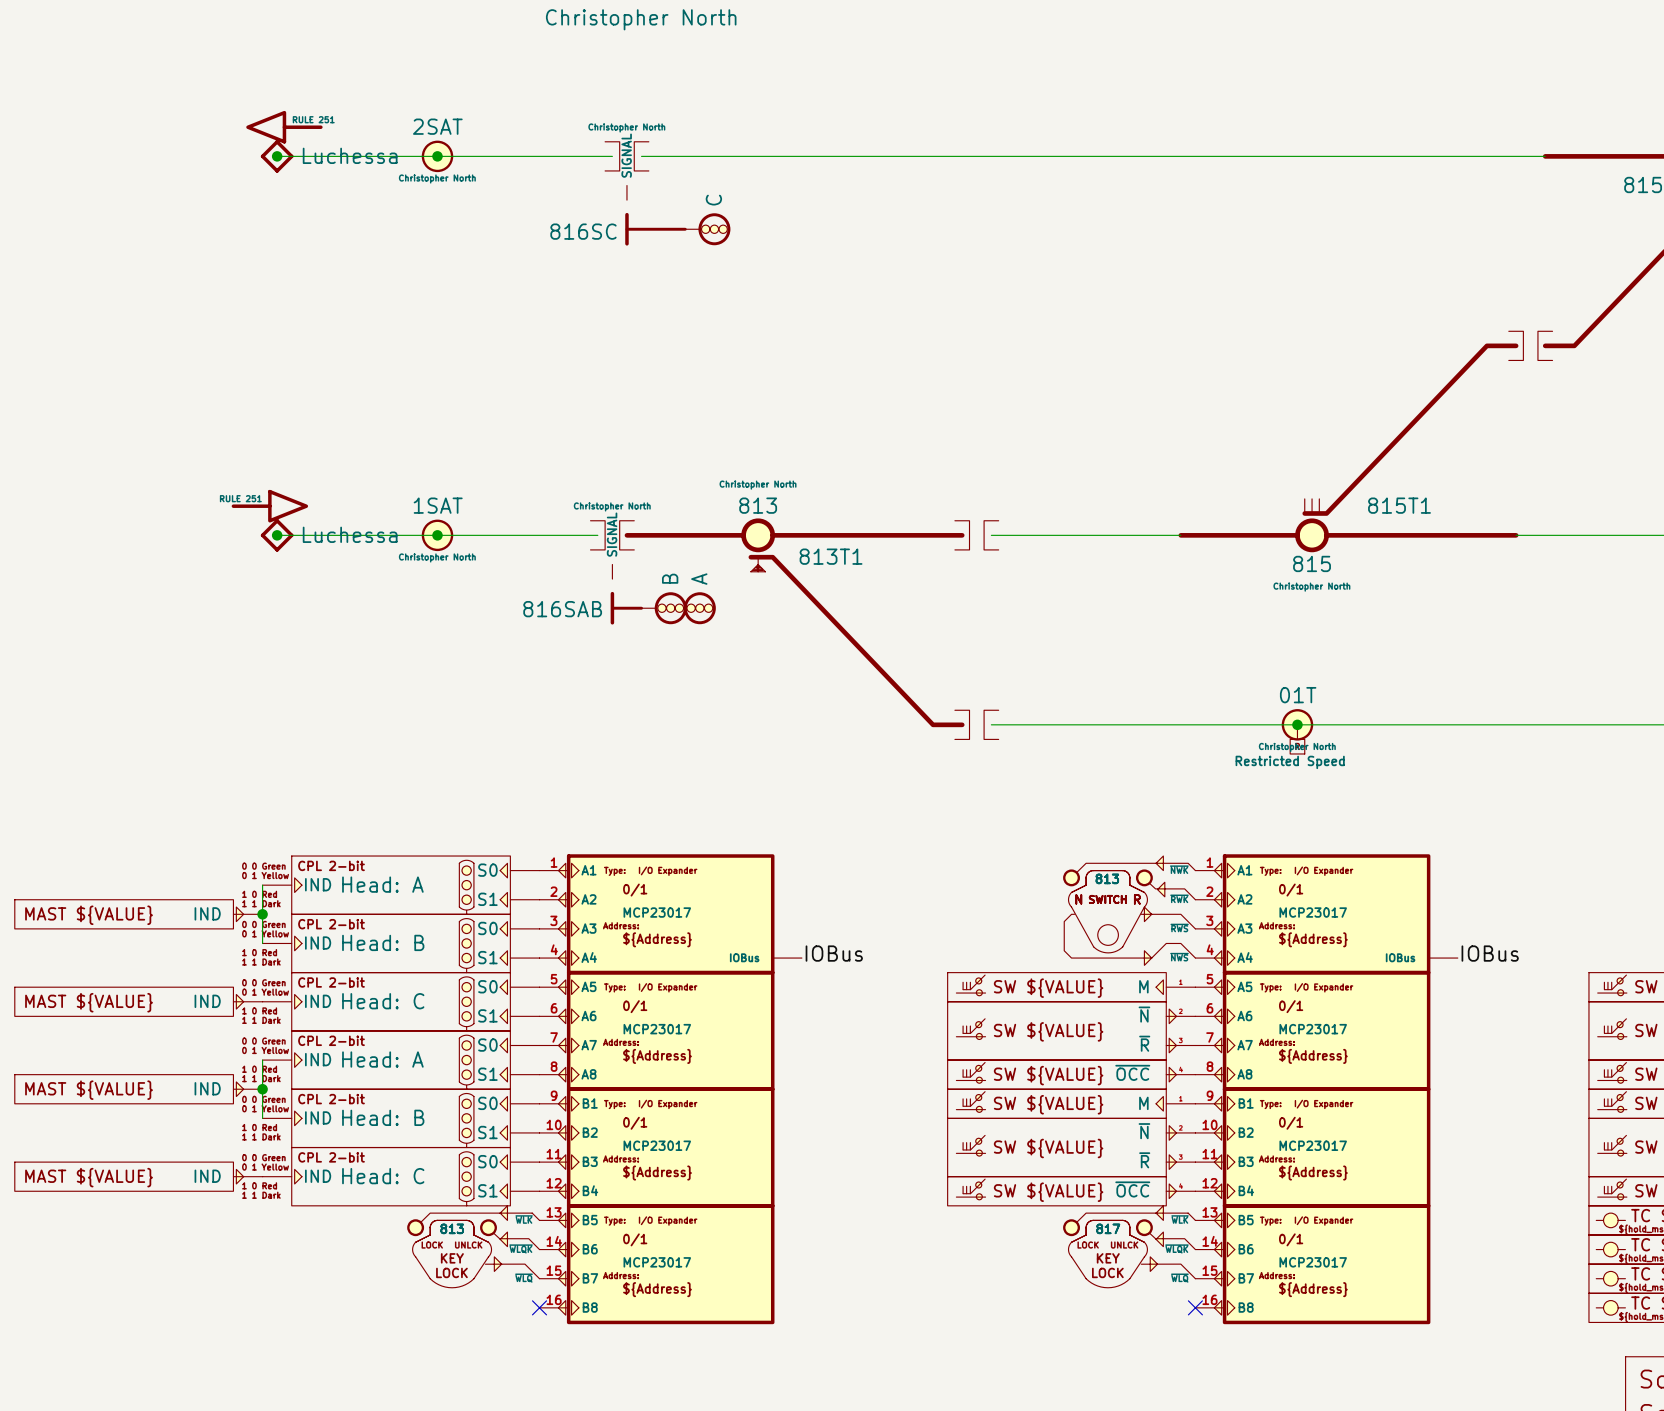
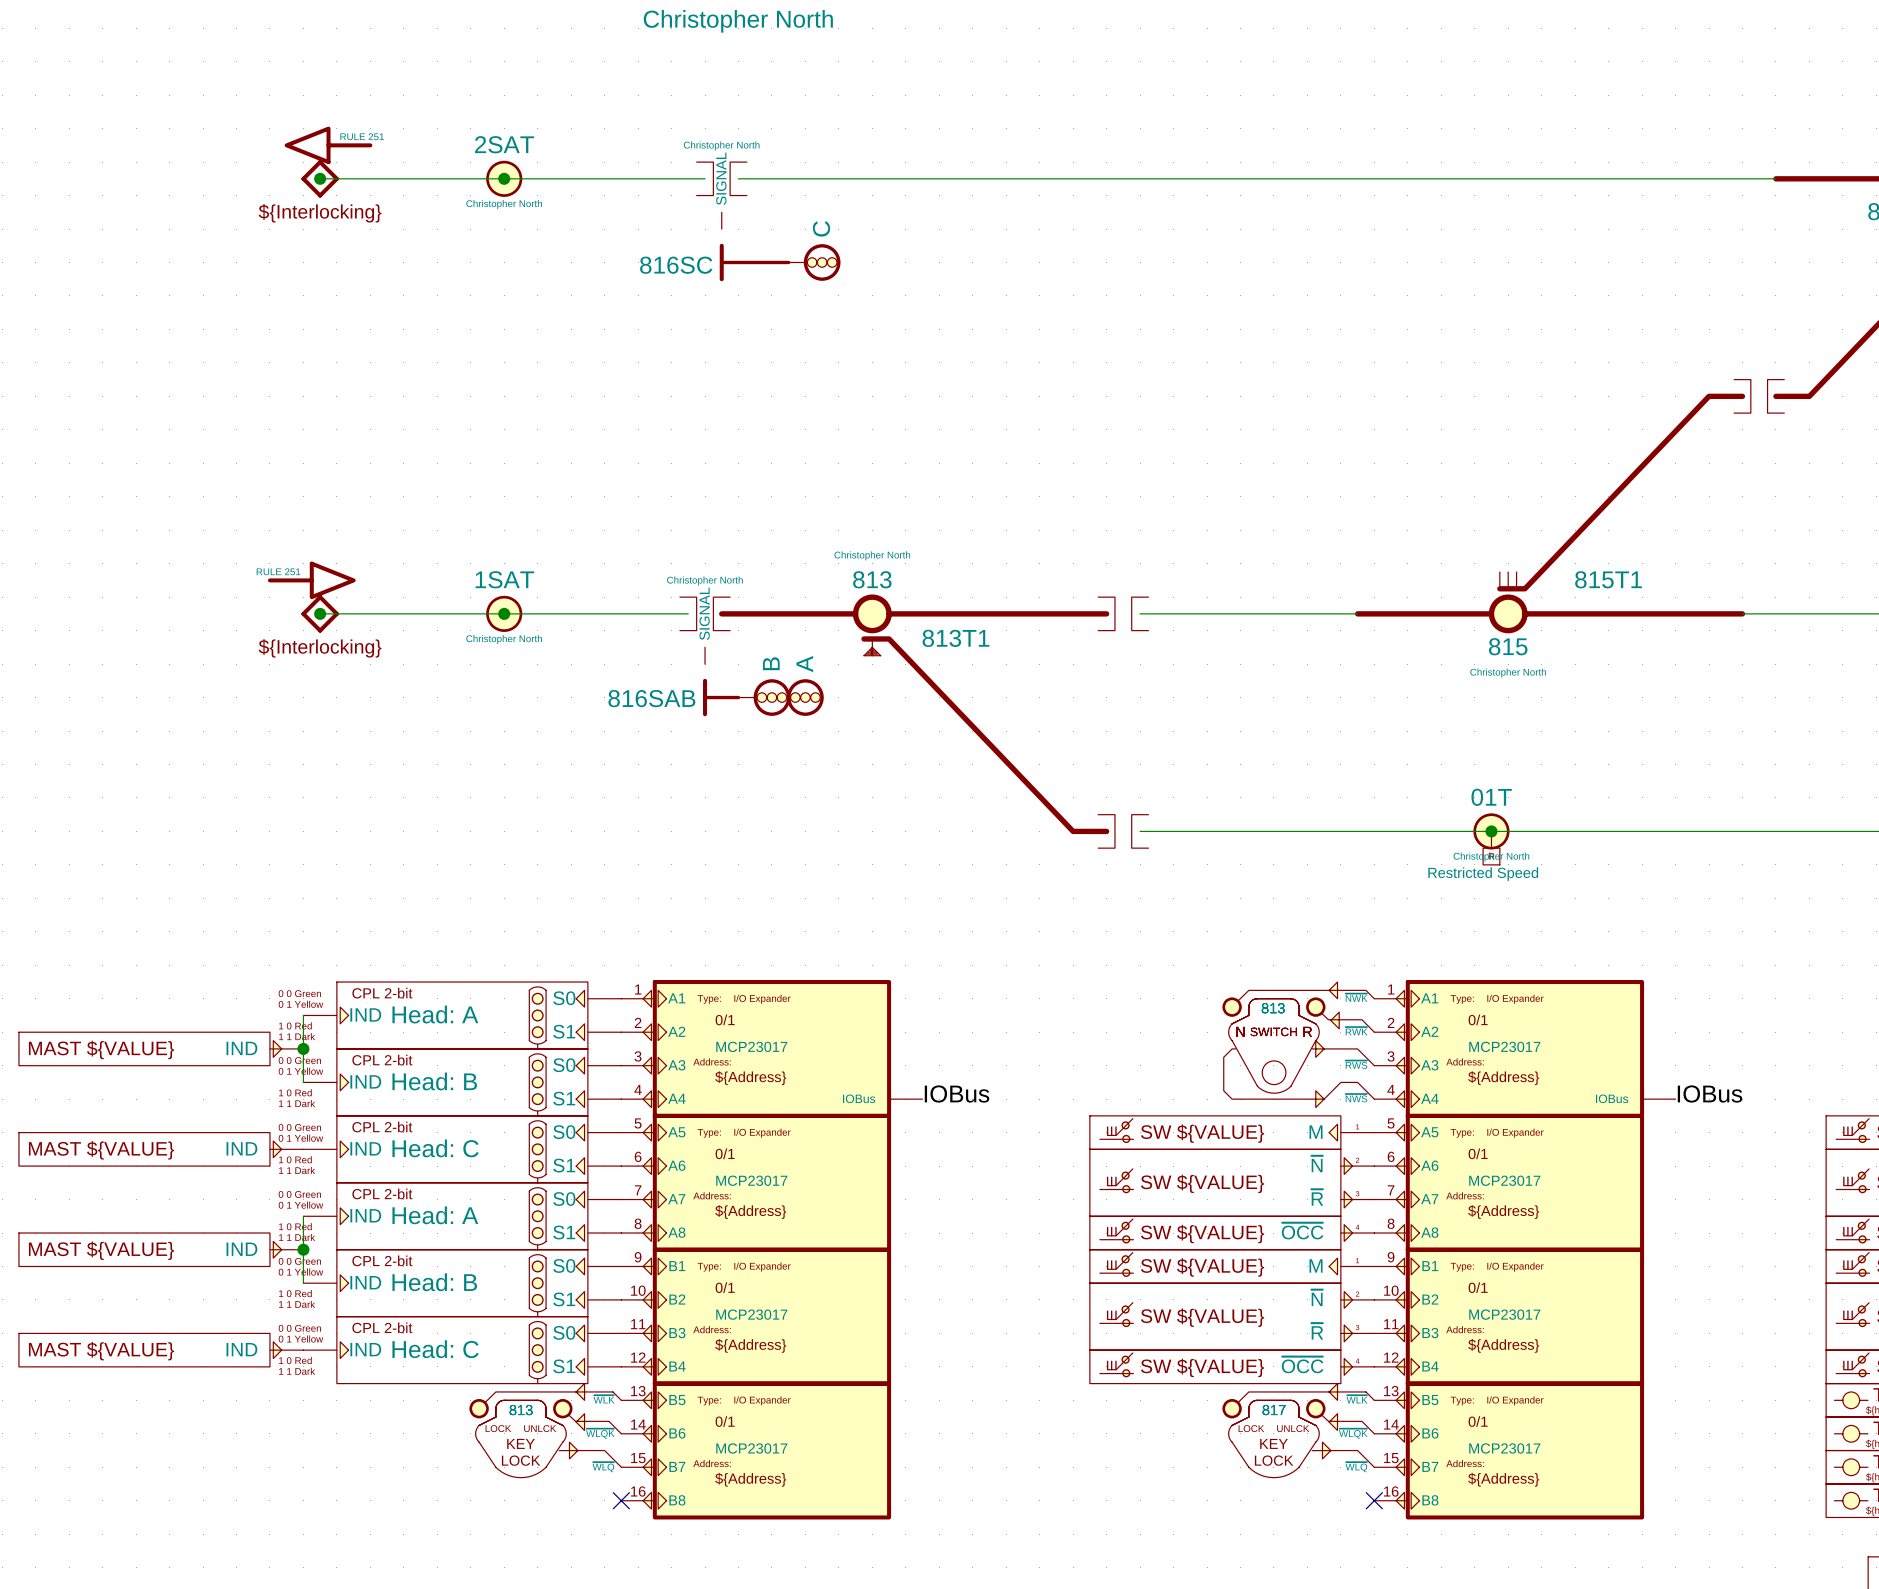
part value: Luchessa (350, 155) -> none
part text: none -> ${Interlocking} (320, 213)
part value: Luchessa (350, 534) -> none
part text: none -> ${Interlocking} (320, 648)

